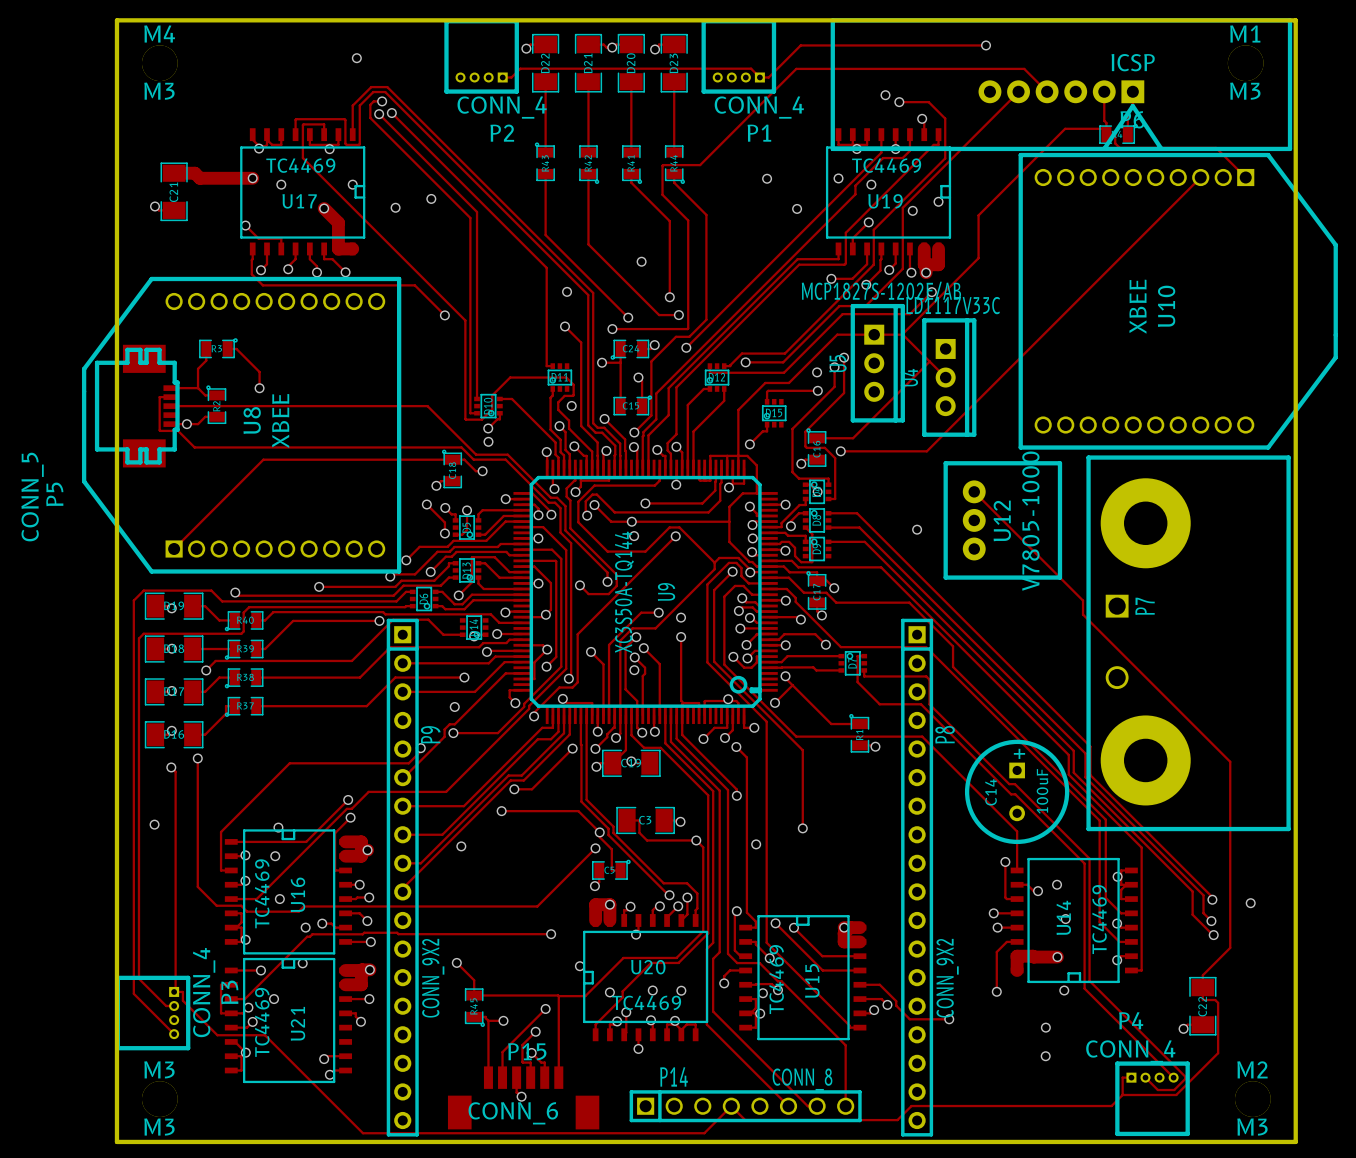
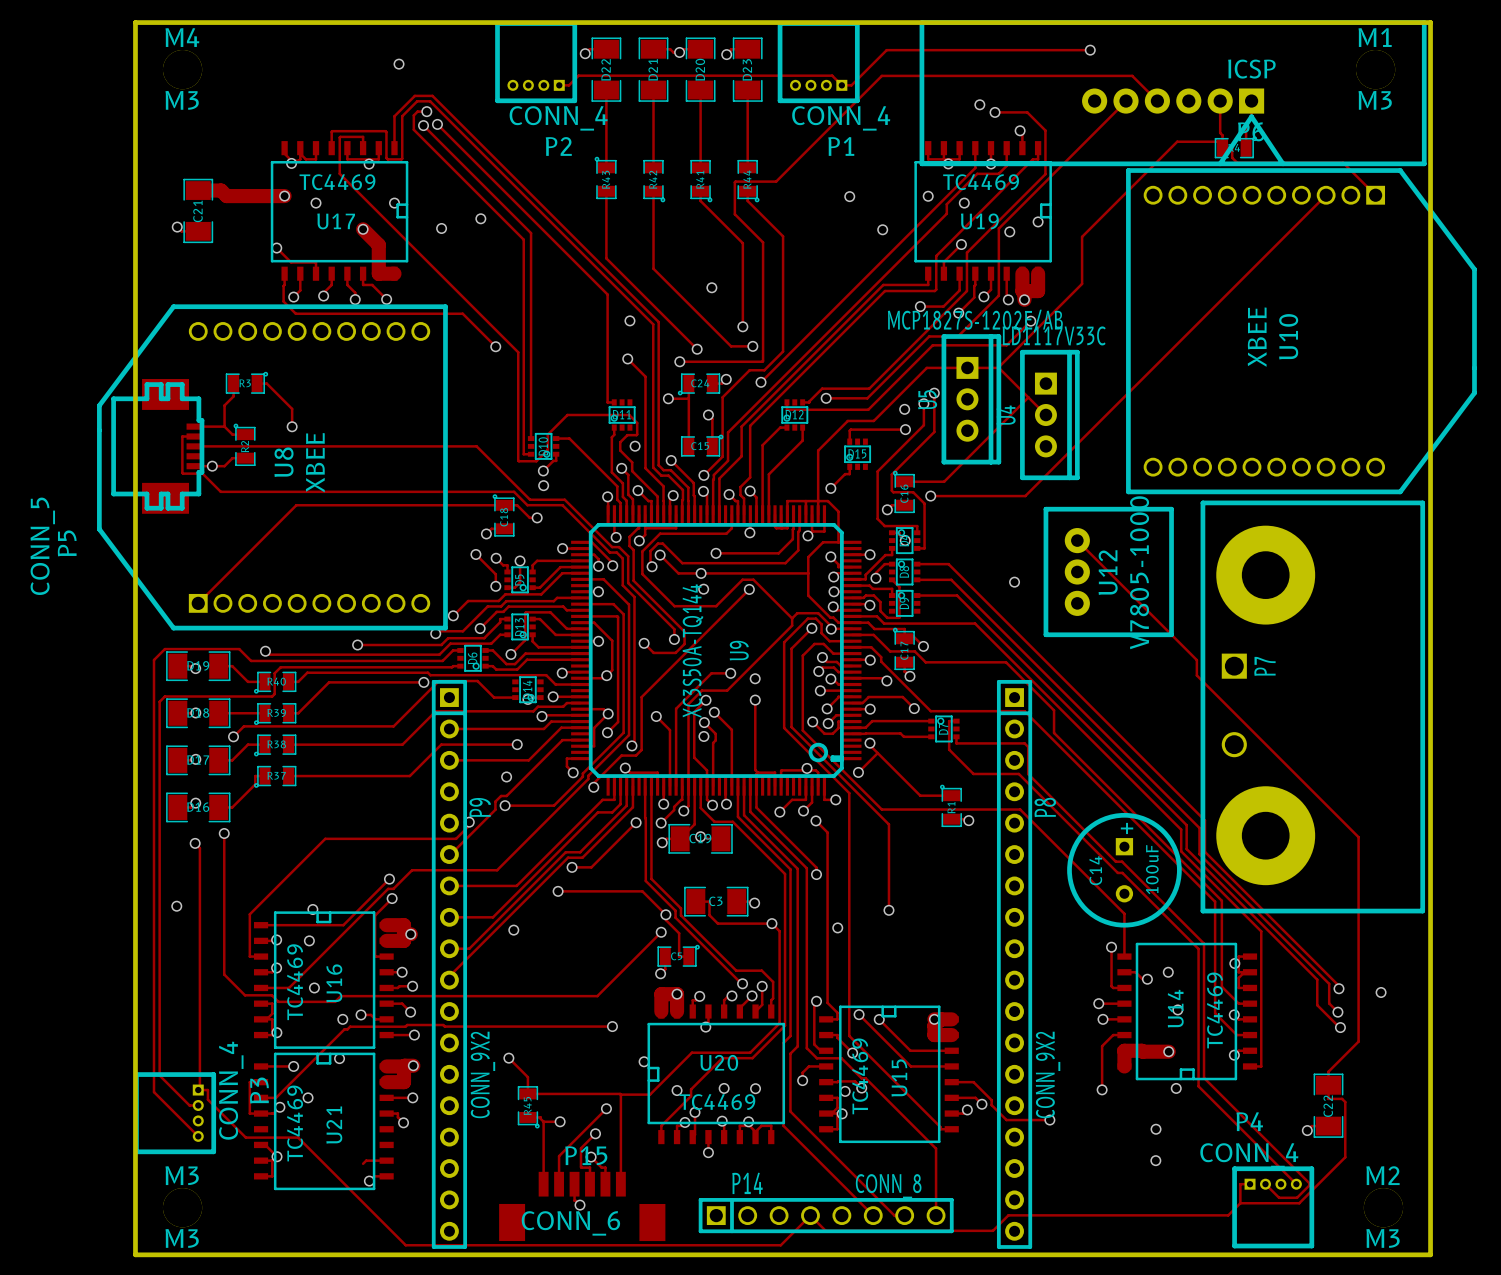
track: (252, 1021) (246, 1027) (231, 1027) -> none
via: (252, 1021) -> none
via: (324, 1059) -> none

